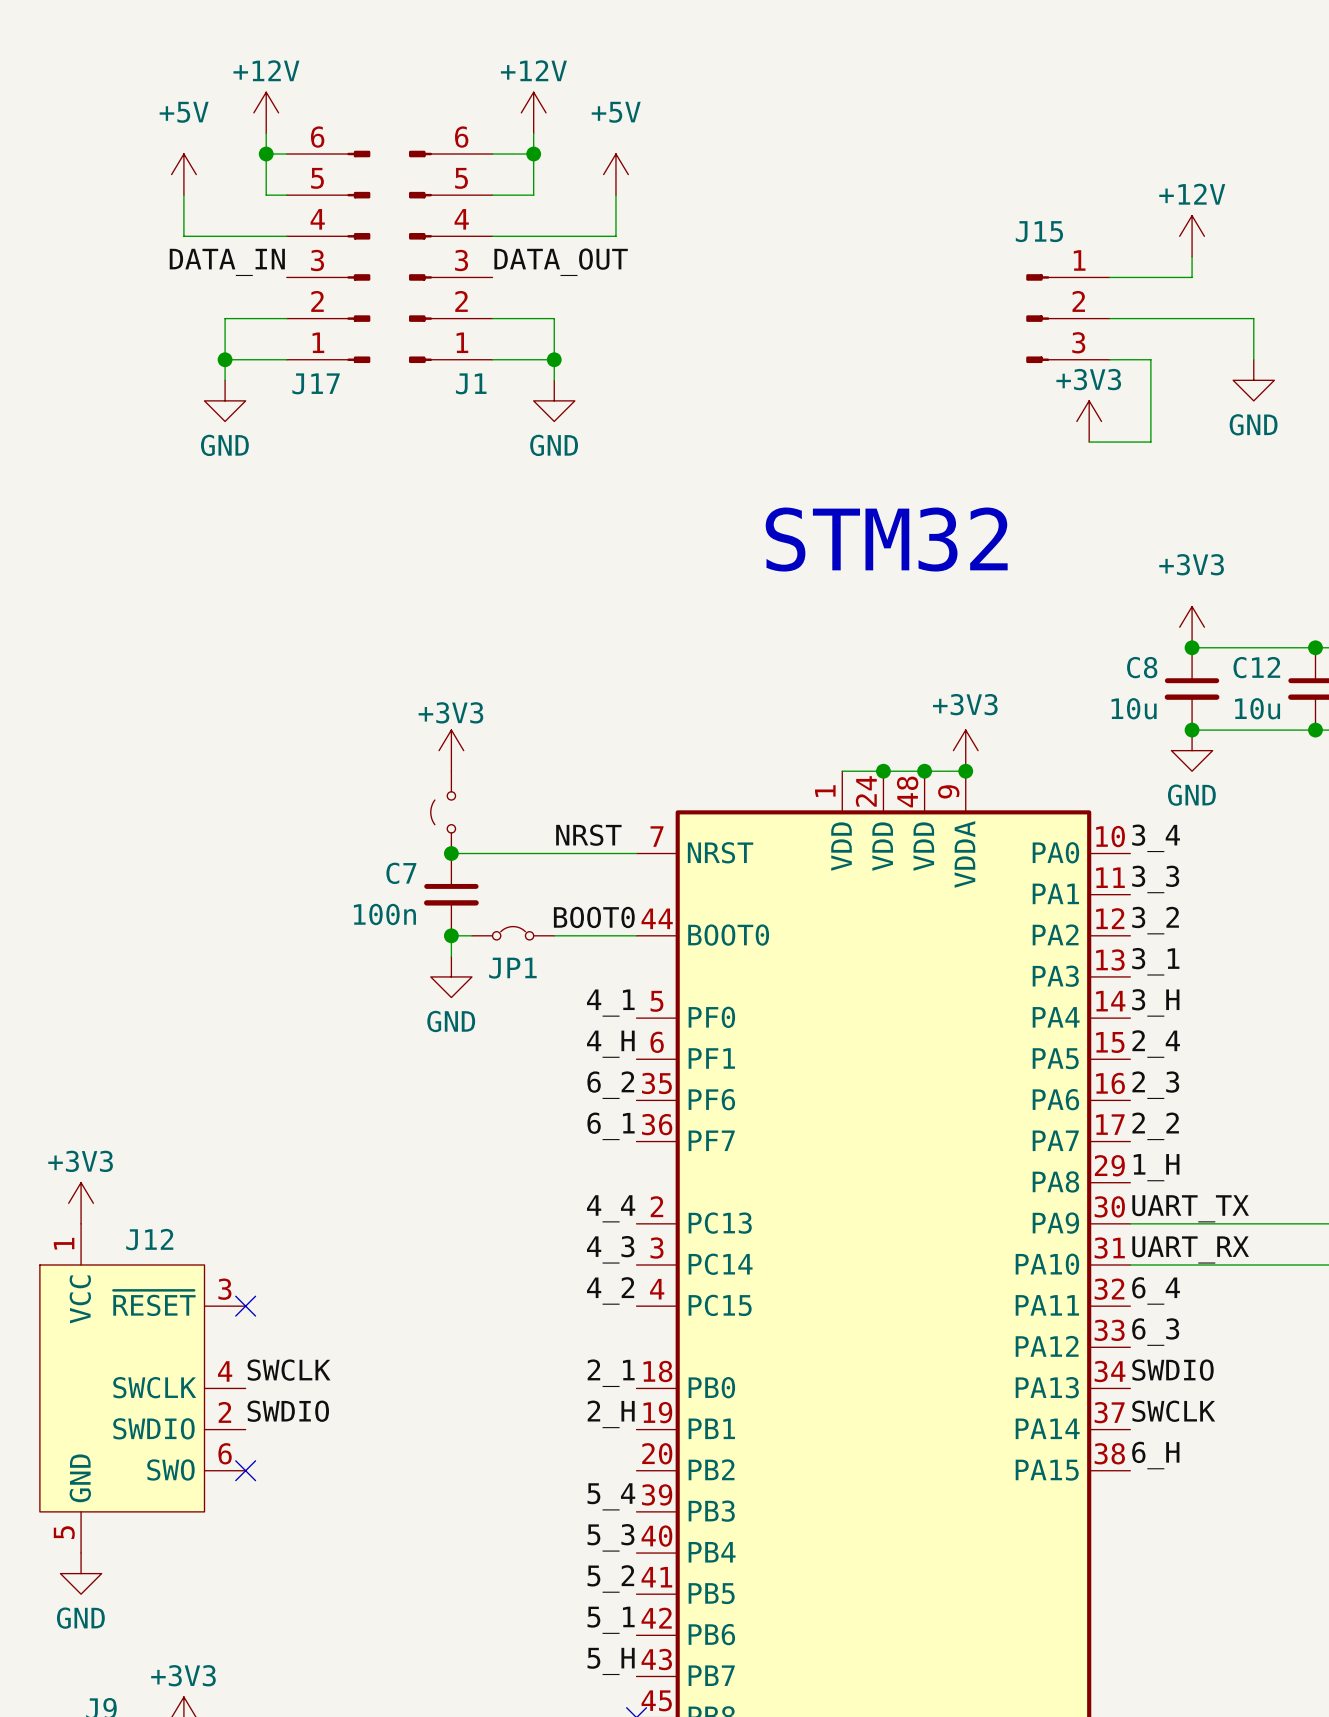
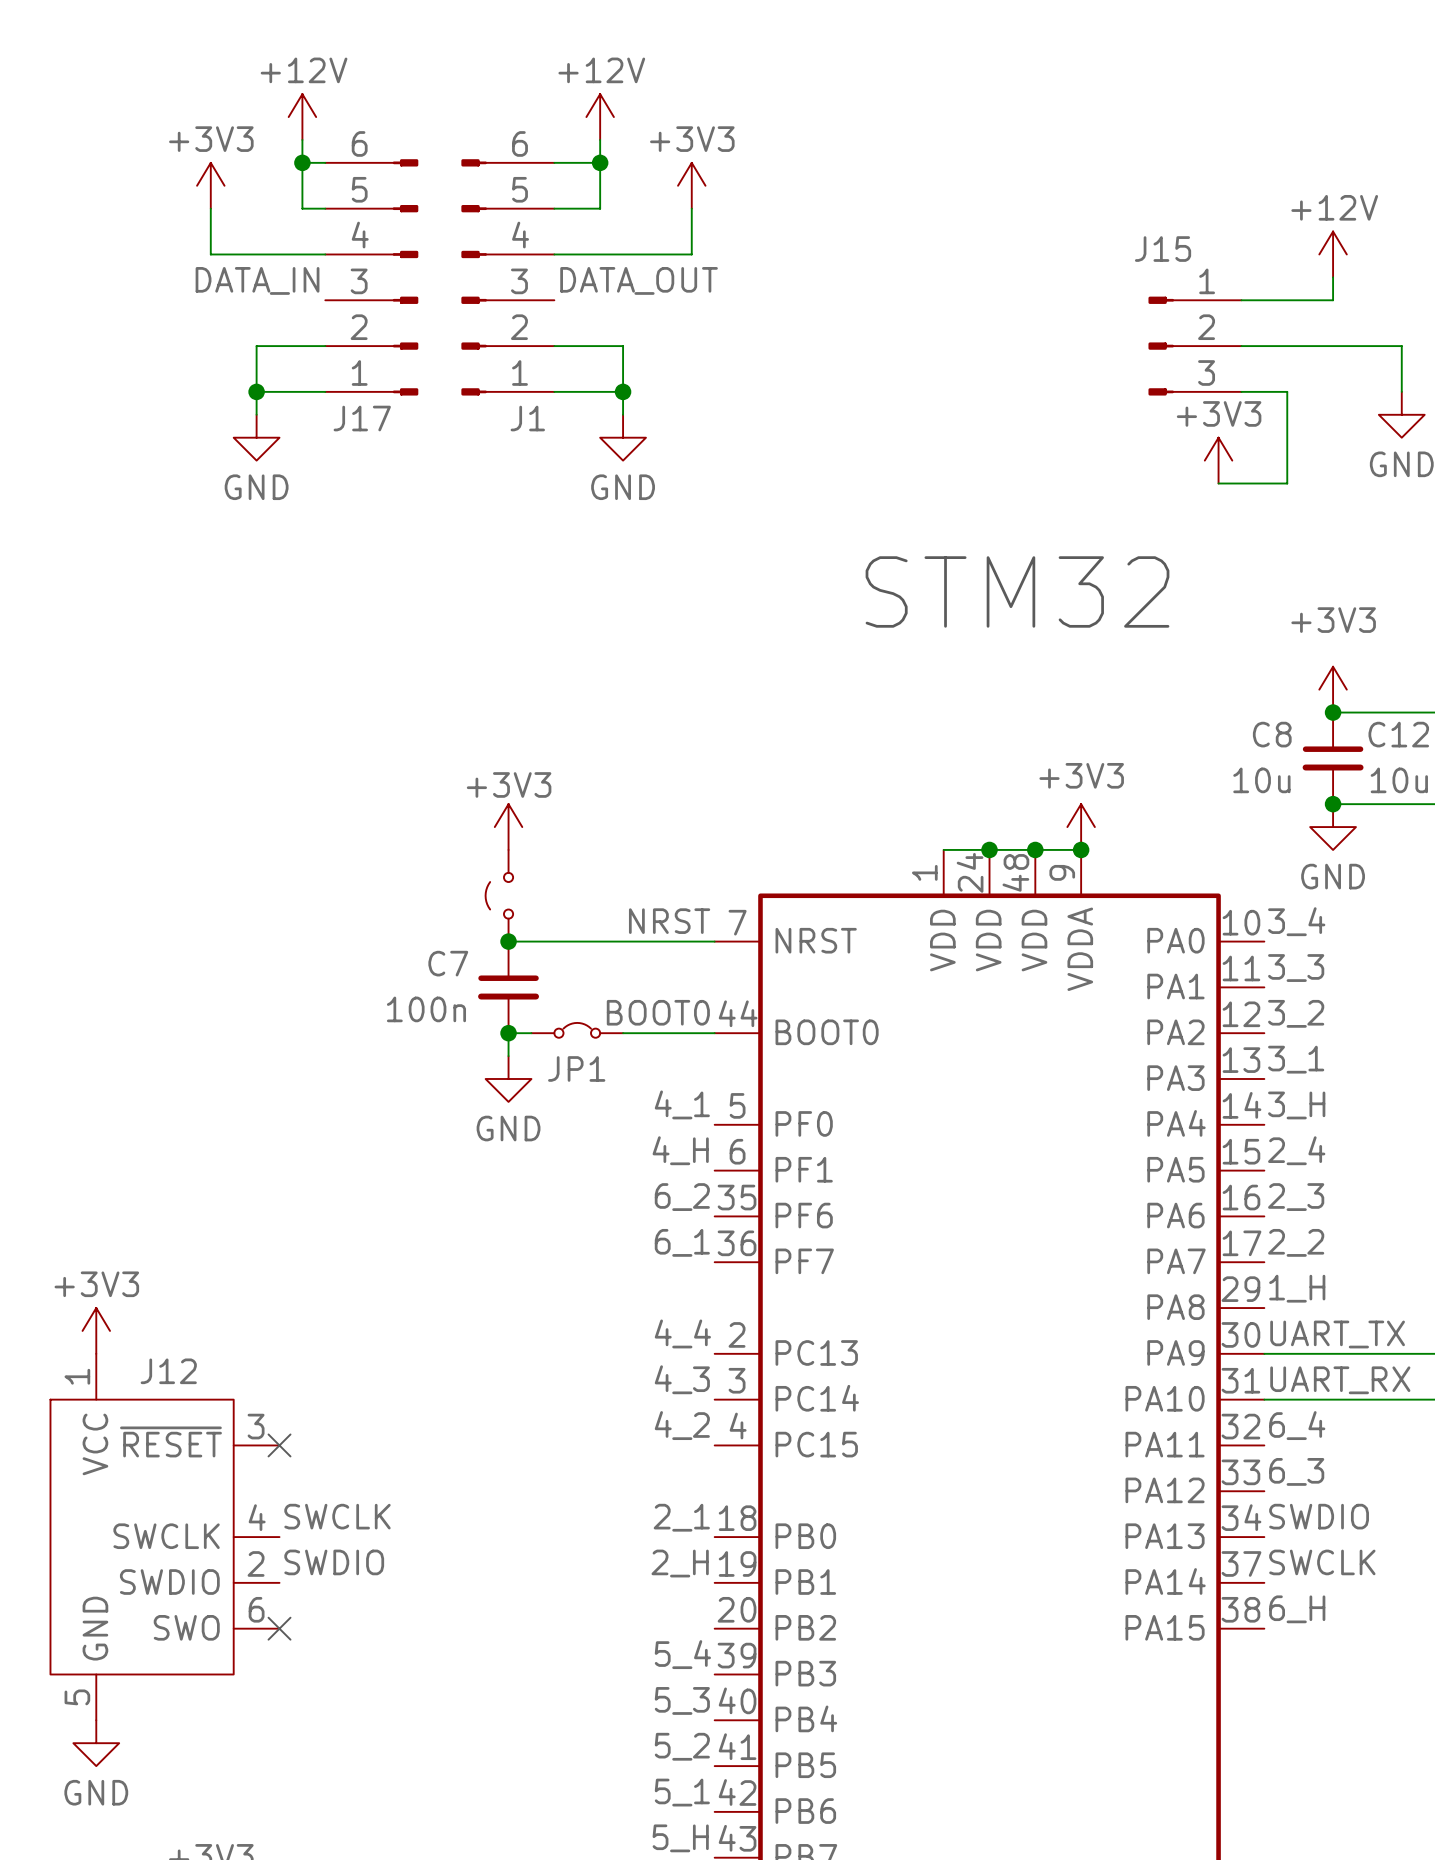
power symbol: +5V (183, 174) -> +3V3 (210, 185)
power symbol: +5V (615, 174) -> +3V3 (691, 185)

